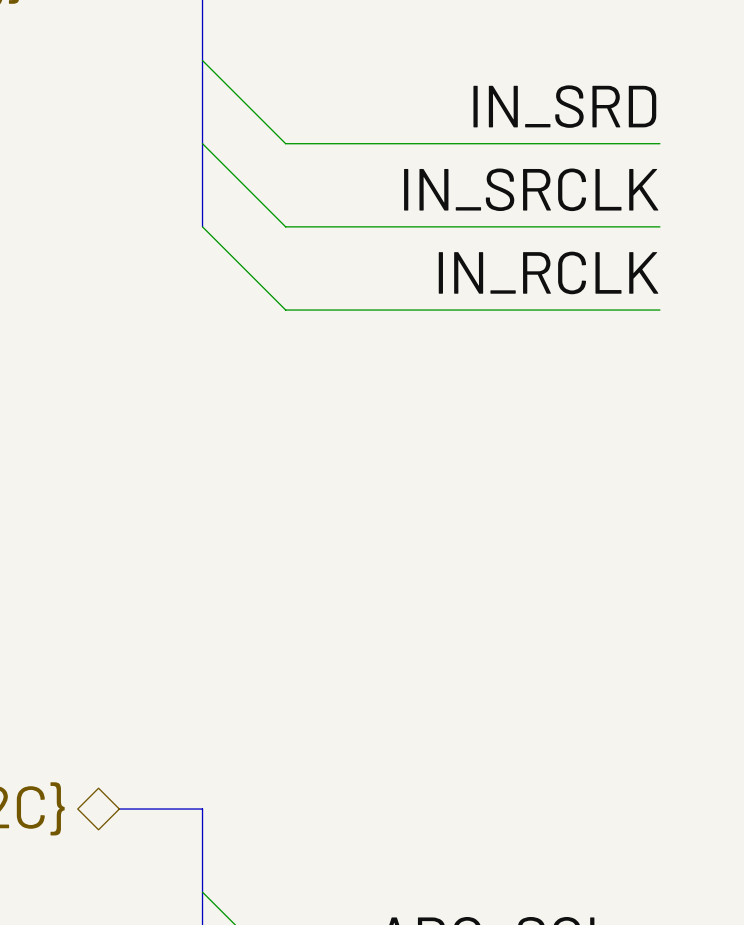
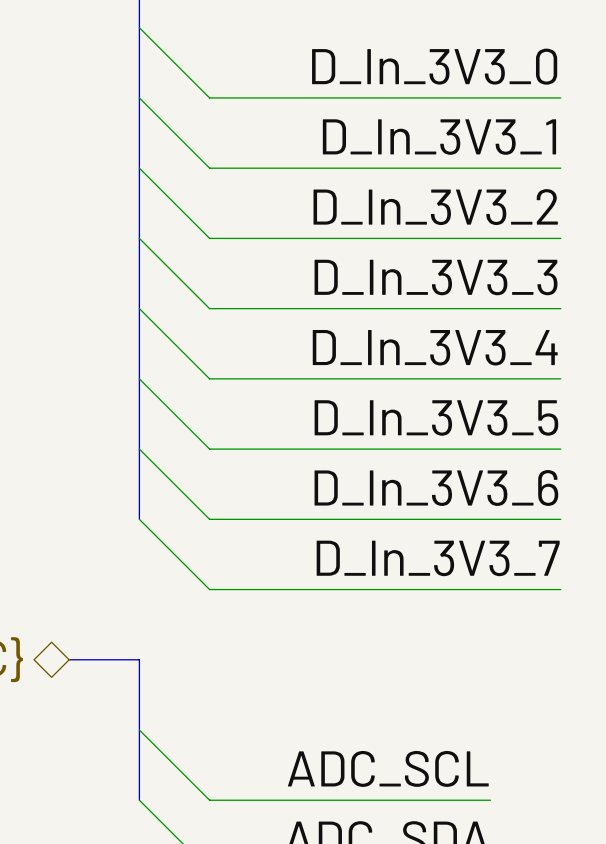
label: none -> D_In_3V3_0 (434, 66)
label: IN_SRD (564, 106) -> none
wire: none -> (525, 97) (560, 97)
label: IN_SRCLK (531, 189) -> none
label: none -> D_In_3V3_1 (439, 137)
bus: none -> (139, 168) (139, 519)
wire: none -> (525, 168) (560, 168)
label: IN_RCLK (548, 272) -> none
label: none -> D_In_3V3_2 (435, 207)
wire: none -> (139, 238) (209, 308) (560, 308)
wire: none -> (525, 238) (560, 238)
label: none -> D_In_3V3_3 (436, 277)
wire: none -> (139, 308) (209, 378) (560, 378)
label: none -> D_In_3V3_4 (435, 347)
wire: none -> (139, 378) (209, 449) (560, 449)
label: none -> D_In_3V3_5 (436, 417)
wire: none -> (139, 449) (209, 519) (560, 519)
label: none -> D_In_3V3_6 (436, 487)
wire: none -> (139, 519) (209, 589) (560, 589)
label: none -> D_In_3V3_7 (438, 558)

